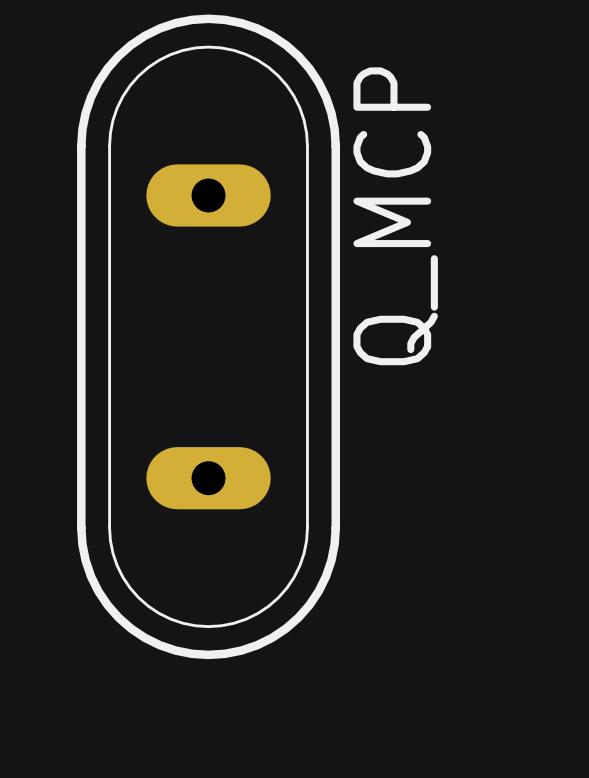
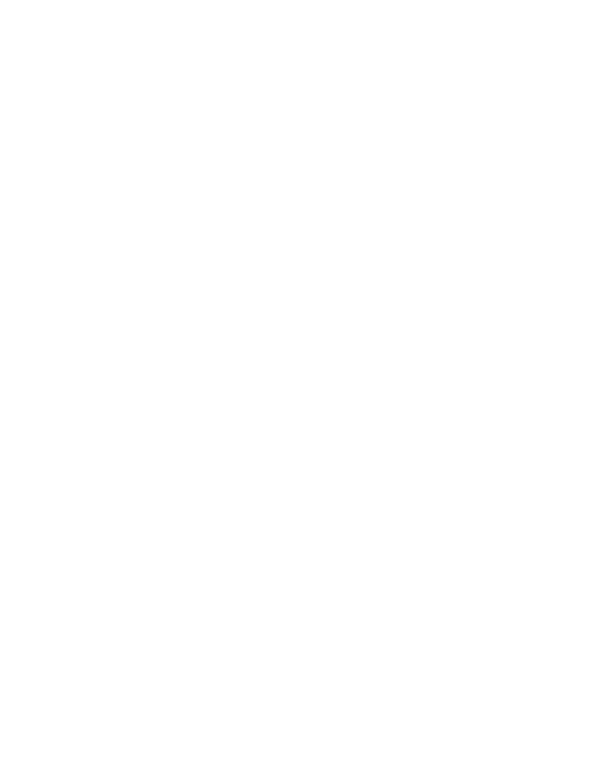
Q_MCP: (208, 336) -> none

